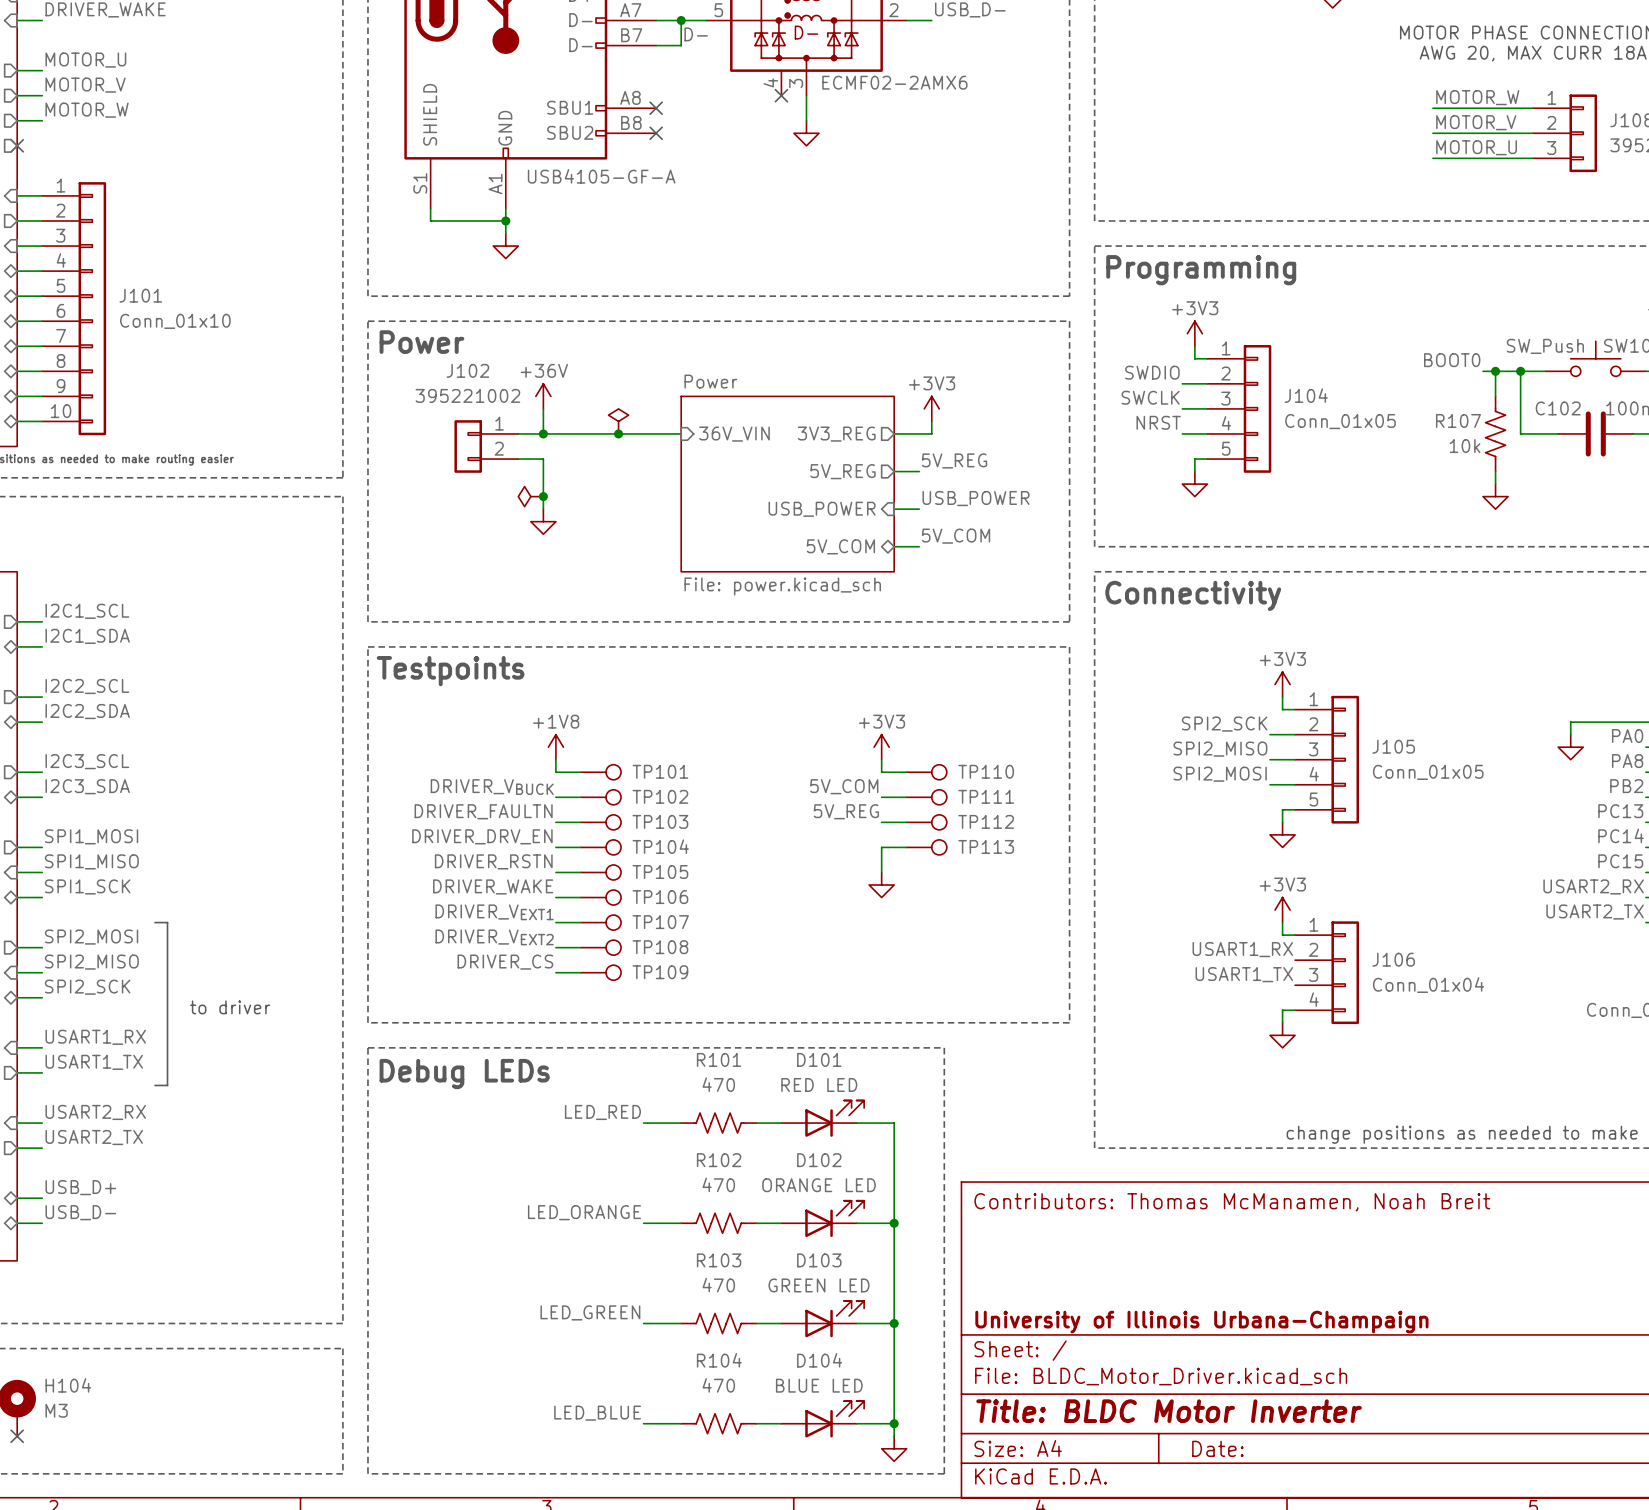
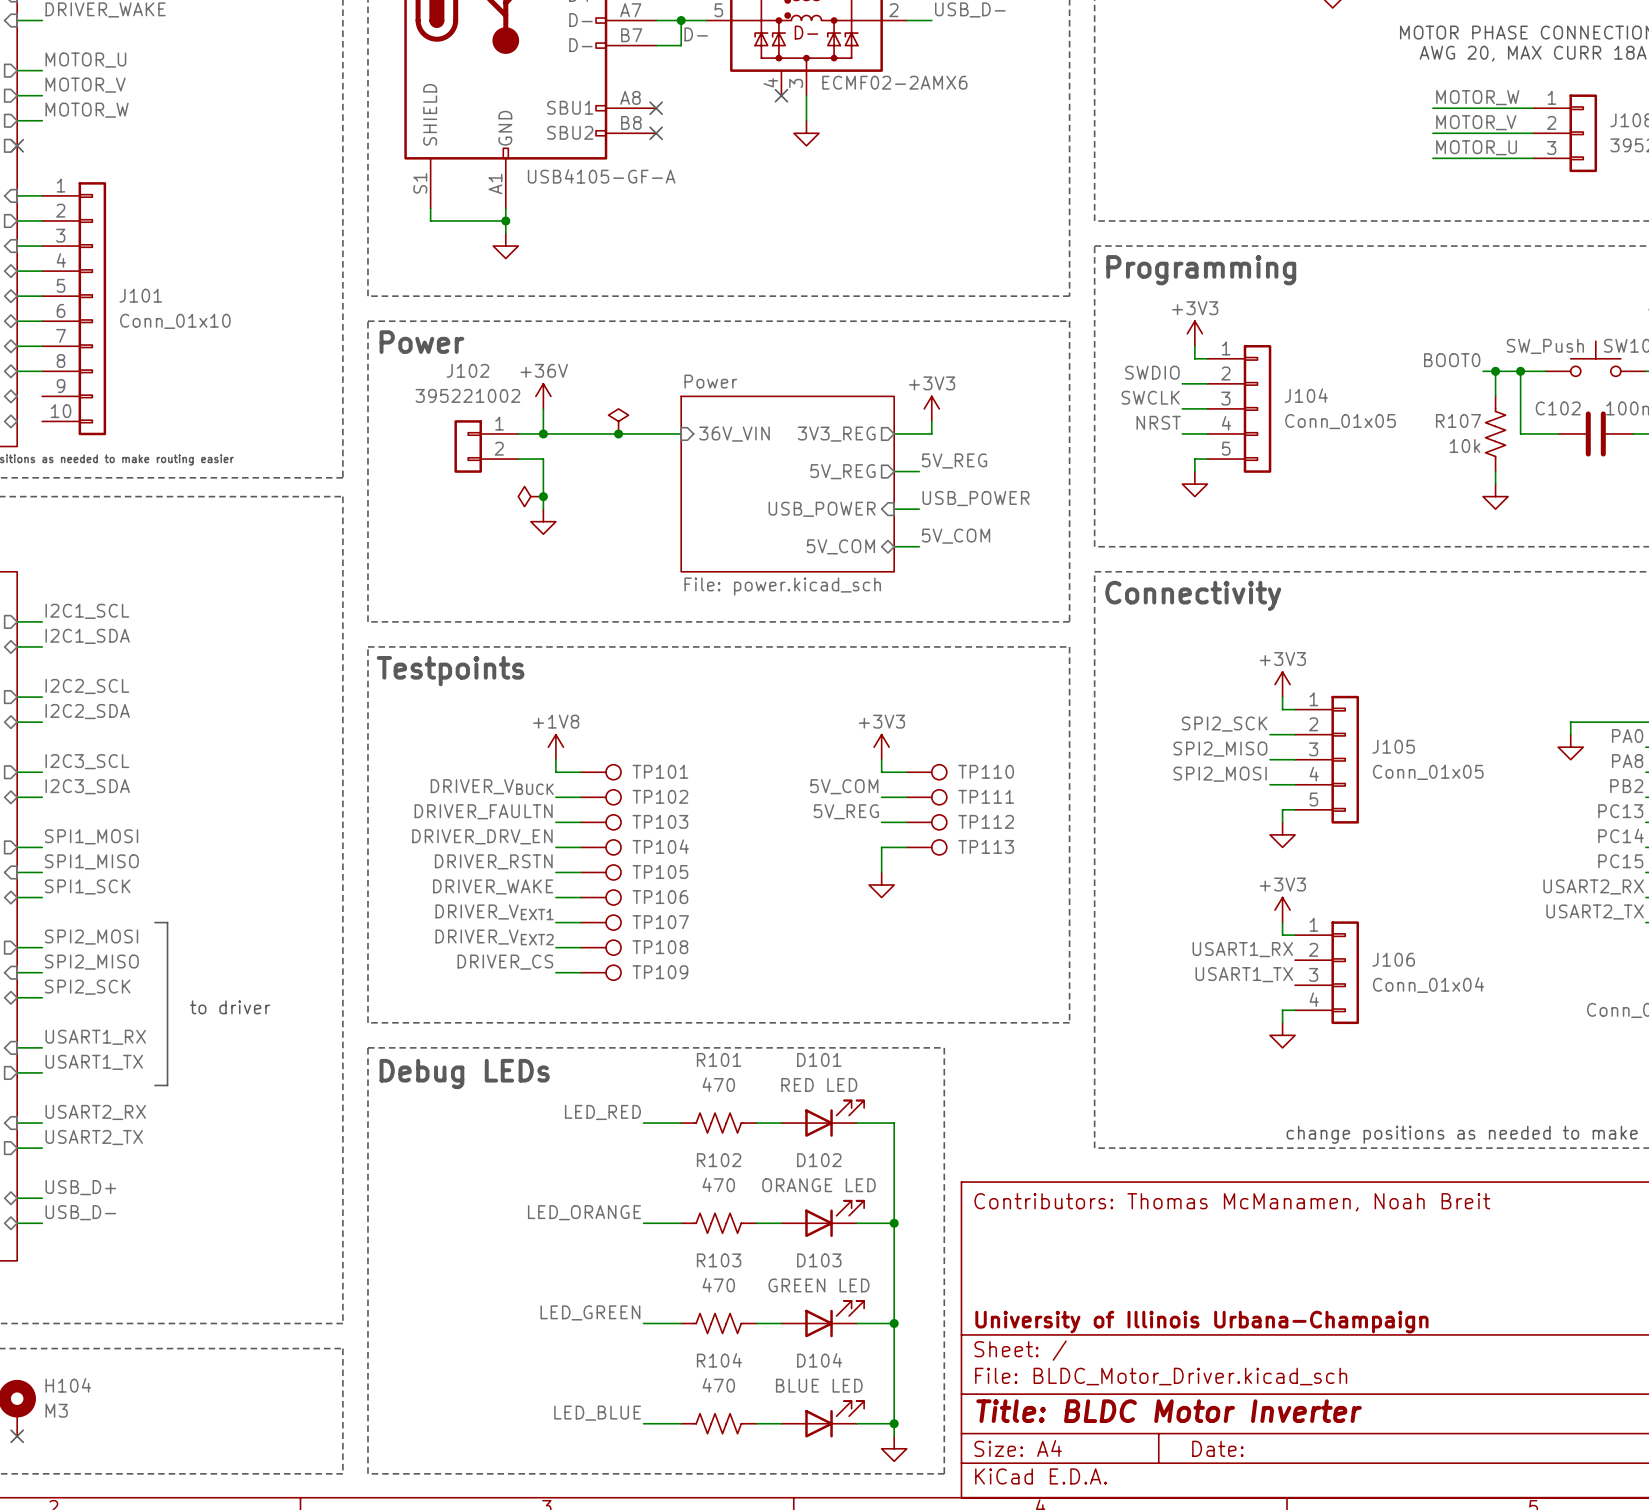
wire: (17, 396) (42, 396) -> none
wire: (17, 421) (42, 421) -> none

